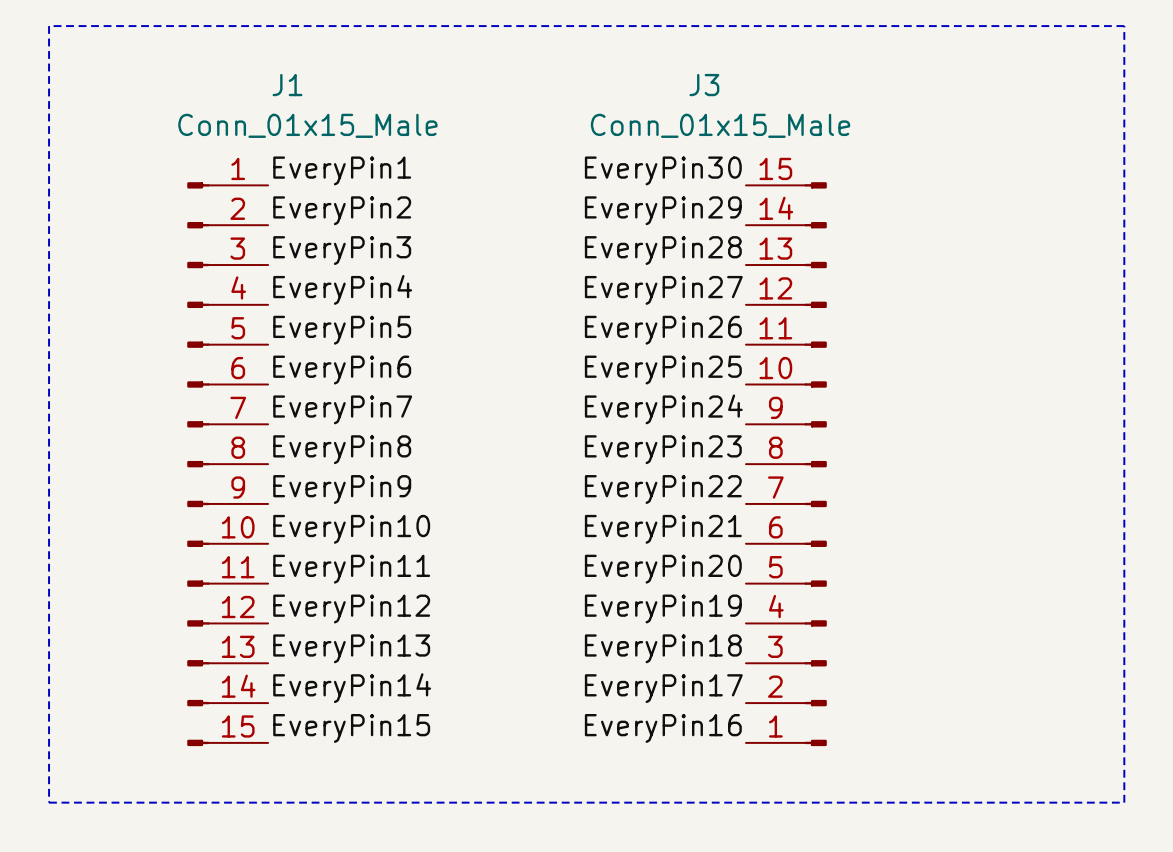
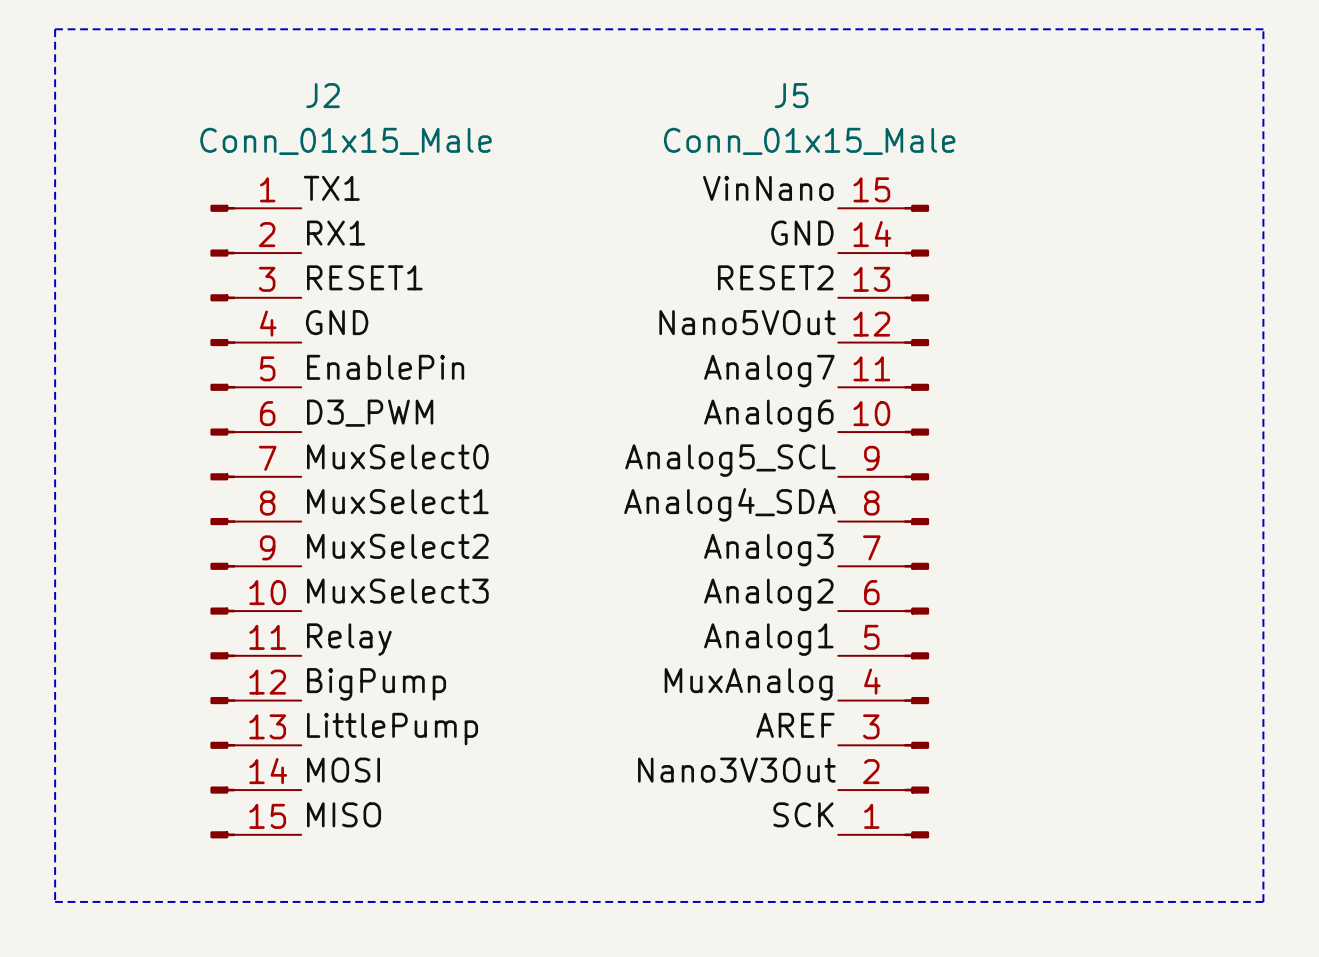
J1 name: J1 (287, 85) -> J2 (323, 95)
J3 name: J3 (704, 85) -> J5 (791, 95)
label: EveryPin1 (342, 170) -> TX1 (331, 188)
label: EveryPin30 (663, 170) -> VinNano (768, 188)
label: EveryPin2 (342, 210) -> RX1 (336, 233)
label: EveryPin29 (663, 210) -> GND (802, 233)
label: EveryPin3 (342, 250) -> RESET1 (364, 277)
label: EveryPin28 (663, 250) -> RESET2 (775, 277)
label: EveryPin4 (342, 289) -> GND (337, 322)
label: EveryPin27 (663, 290) -> Nano5VOut (747, 322)
label: EveryPin5 (342, 330) -> EnablePin (385, 367)
label: EveryPin26 (663, 330) -> Analog7 (769, 371)
label: EveryPin6 (342, 370) -> D3_PWM (370, 413)
label: EveryPin25 (663, 370) -> Analog6 (768, 415)
label: EveryPin7 (342, 409) -> MuxSelect0 (397, 456)
label: EveryPin24 (663, 409) -> Analog5_SCL (730, 460)
label: EveryPin8 (342, 449) -> MuxSelect1 (397, 501)
label: EveryPin23 (663, 449) -> Analog4_SDA (729, 504)
label: EveryPin9 (342, 489) -> MuxSelect2 (397, 546)
label: EveryPin22 (663, 489) -> Analog3 (768, 550)
label: EveryPin10 (351, 529) -> MuxSelect3 (397, 591)
label: EveryPin21 (663, 529) -> Analog2 (768, 594)
label: EveryPin11 (351, 569) -> Relay (349, 639)
label: EveryPin20 (663, 569) -> Analog1 (768, 639)
label: EveryPin12 (351, 608) -> BigPump (376, 684)
label: EveryPin19 (663, 608) -> MuxAnalog (748, 684)
label: EveryPin13 (351, 648) -> LittlePump (392, 729)
label: EveryPin18 (663, 648) -> AREF (795, 725)
label: EveryPin14 (352, 688) -> MOSI (343, 770)
label: EveryPin17 (663, 688) -> Nano3V3Out (736, 770)
label: EveryPin15 (351, 728) -> MISO (344, 814)
label: EveryPin16 (663, 728) -> SCK (803, 814)

